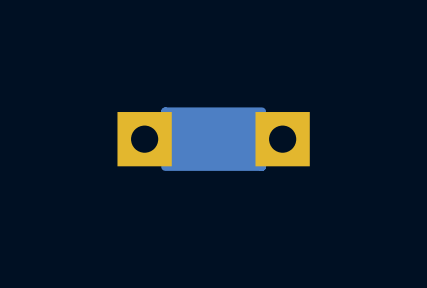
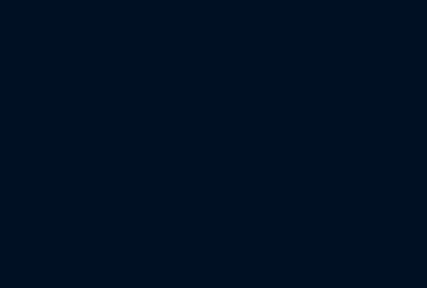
part: (213, 139) -> none

